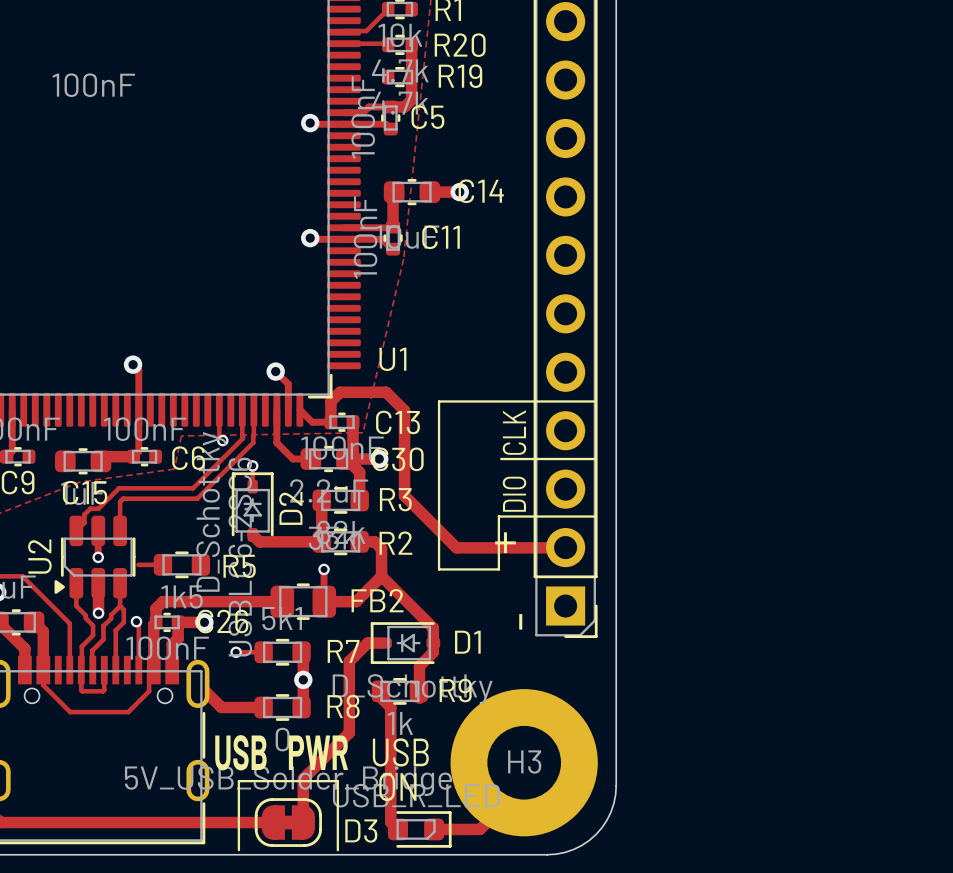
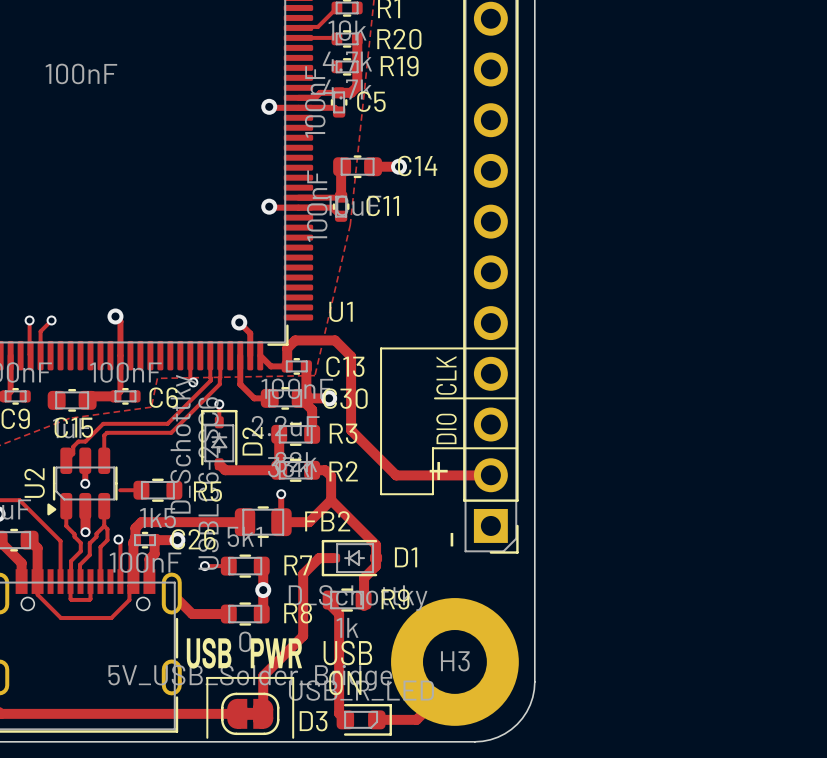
track: none -> (29, 320) (30, 355)
via: none -> (29, 320)
track: none -> (51, 320) (40, 331) (40, 355)
via: none -> (51, 320)

